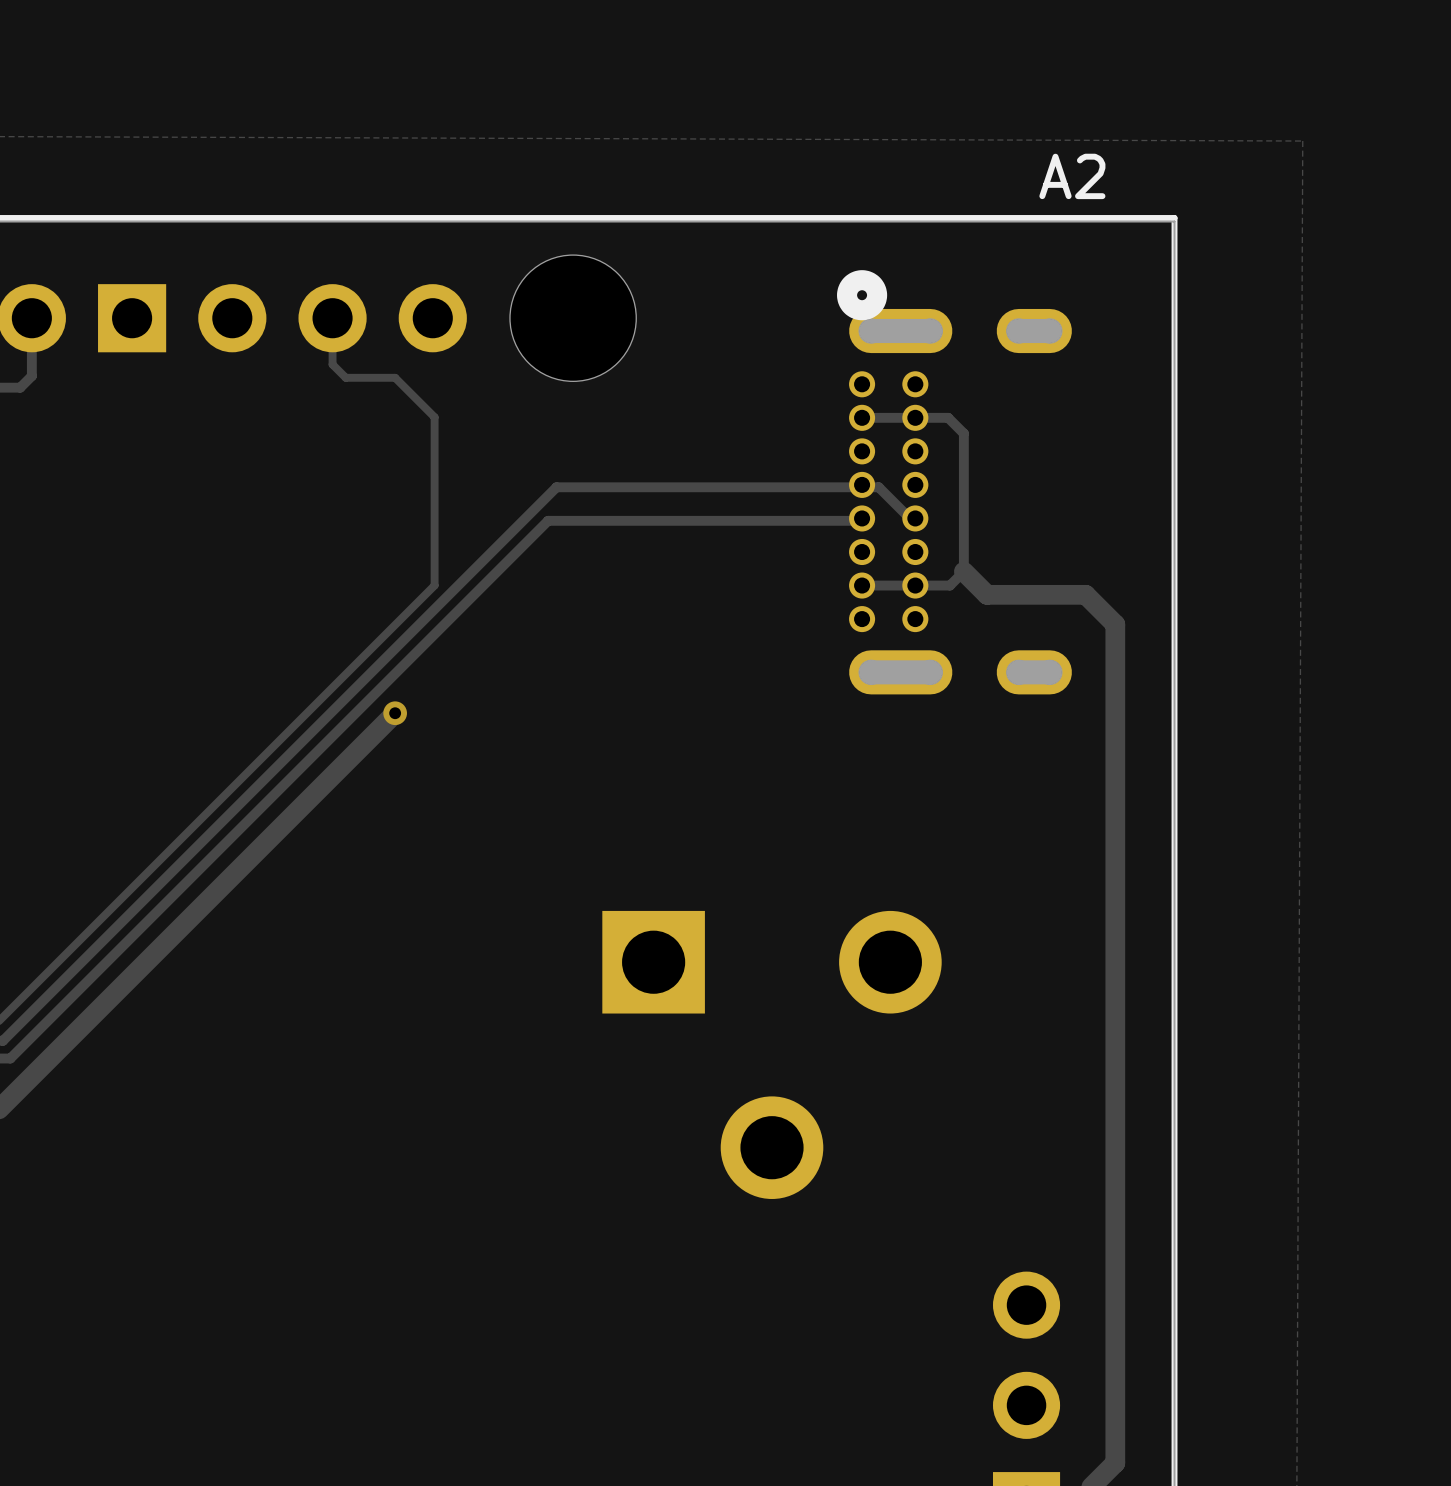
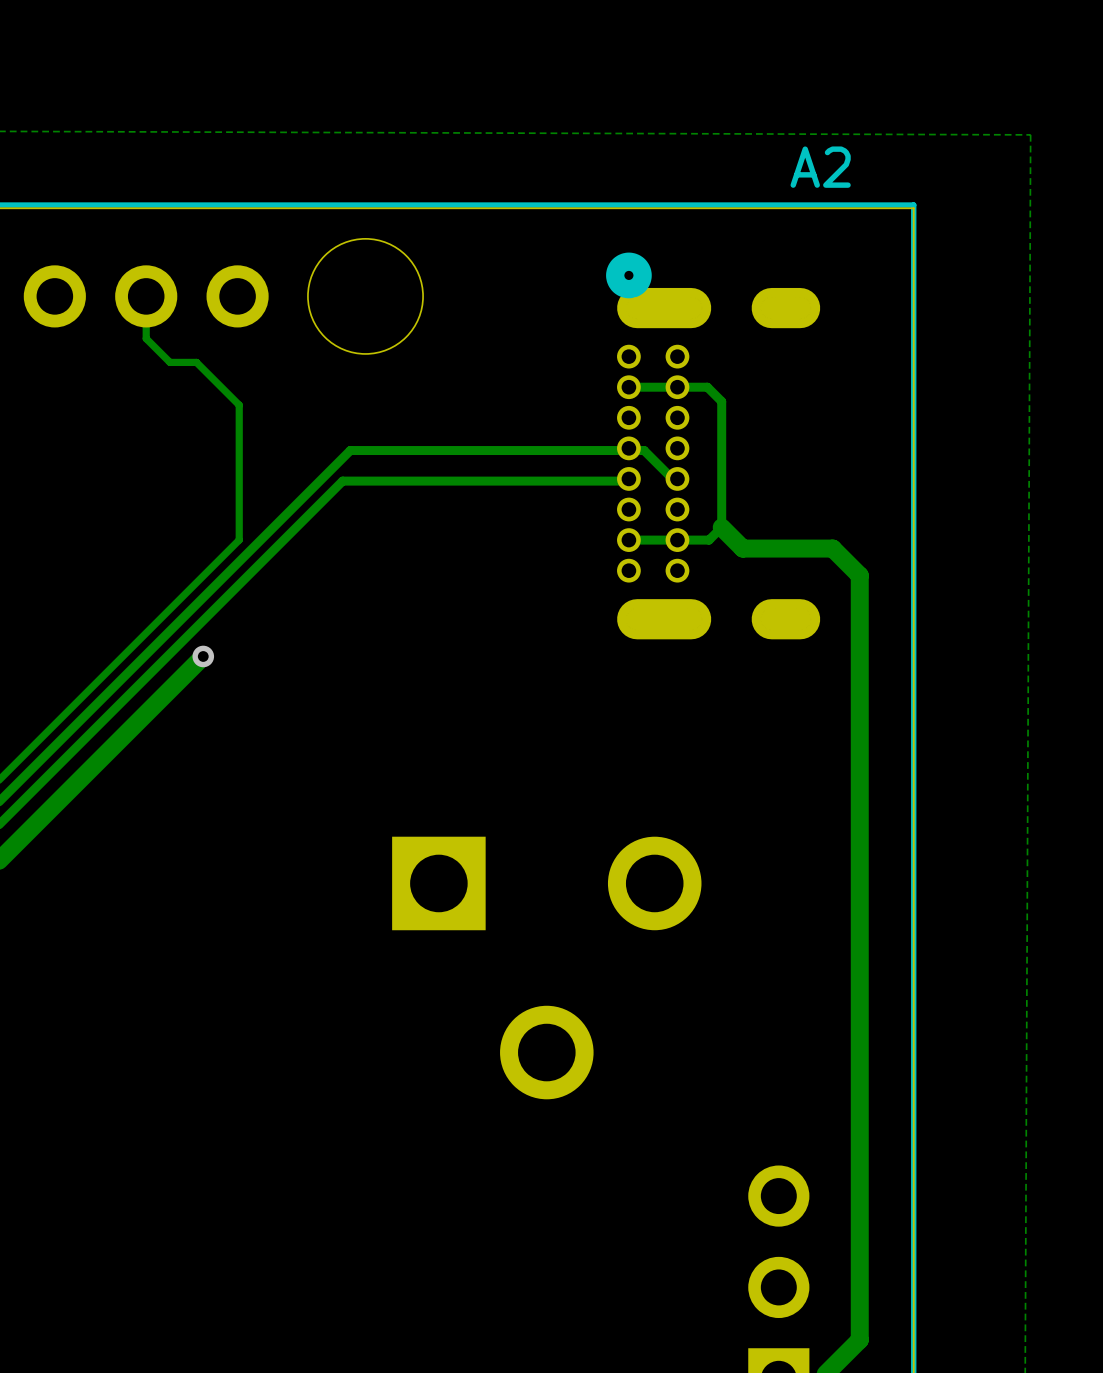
track: (345, 377) (395, 377) (434, 417) (434, 437) -> (158, 350) (169, 362) (196, 362) (239, 405)

